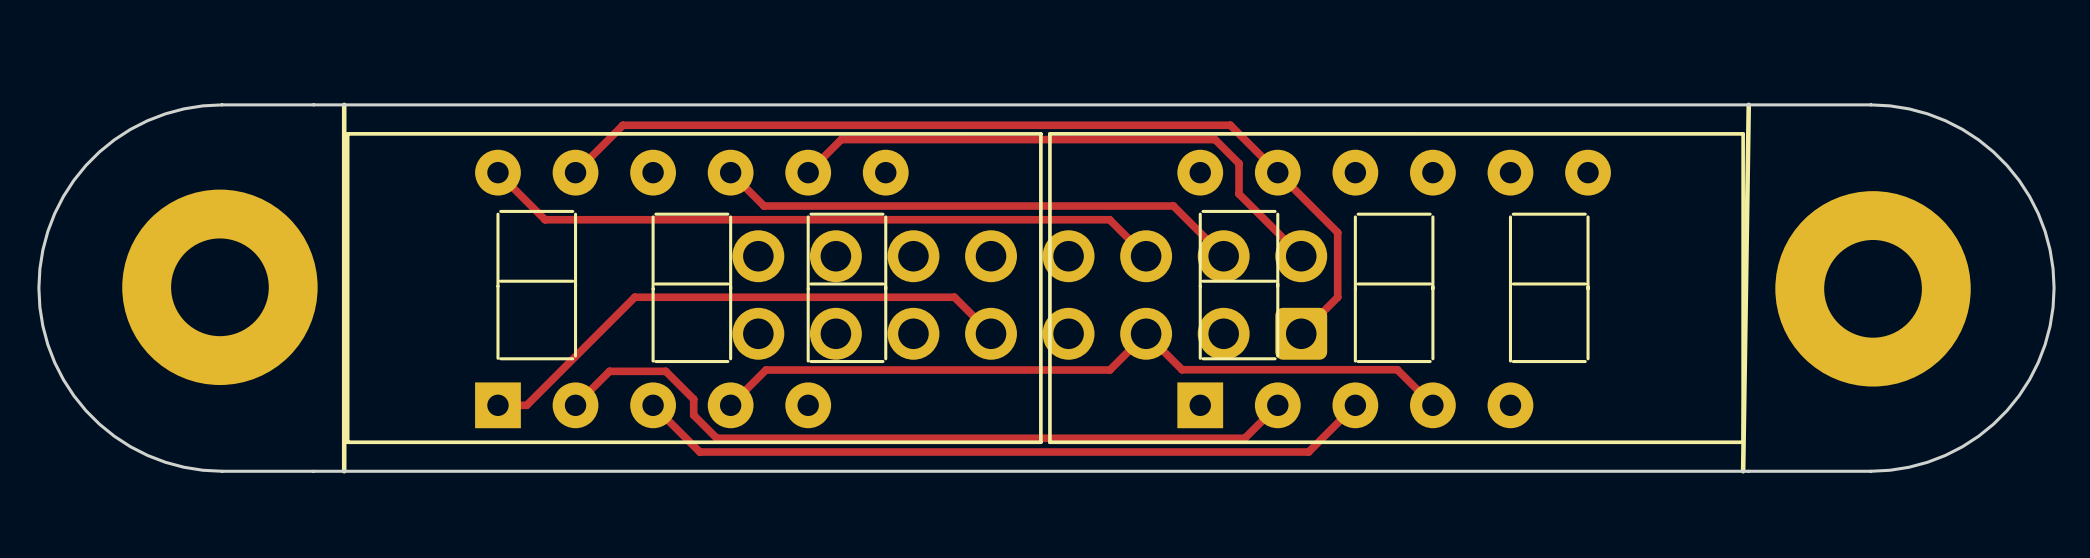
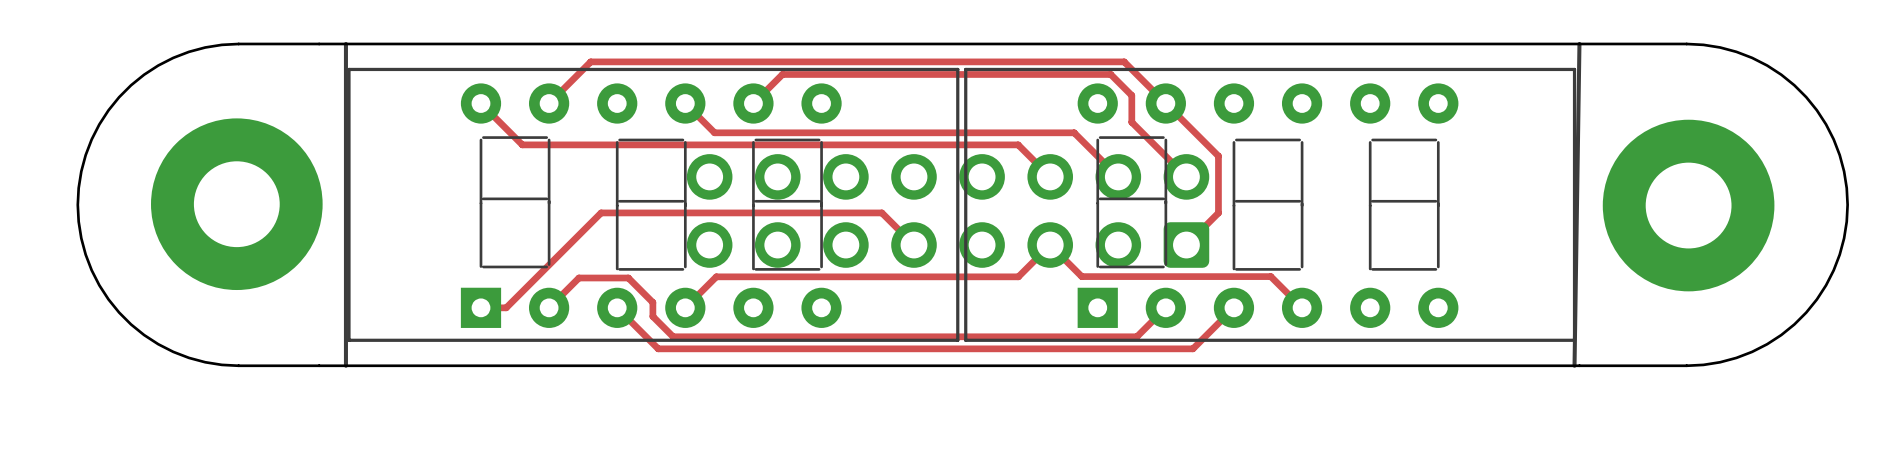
part footprint: [345, 132, 1043, 445] -> [347, 67, 960, 342]
part footprint: [1048, 132, 1745, 445] -> [964, 67, 1577, 342]

